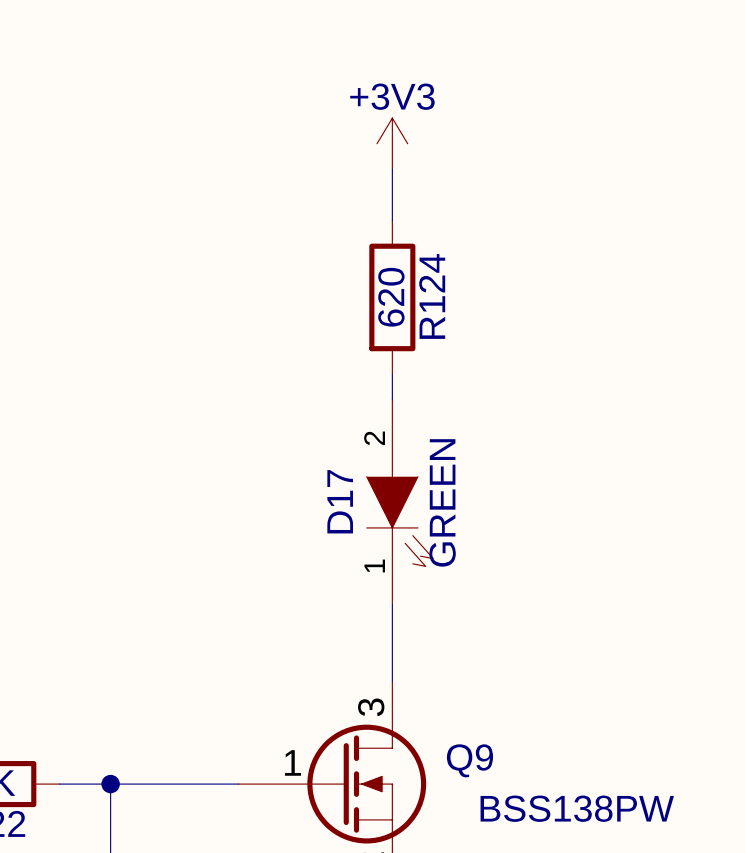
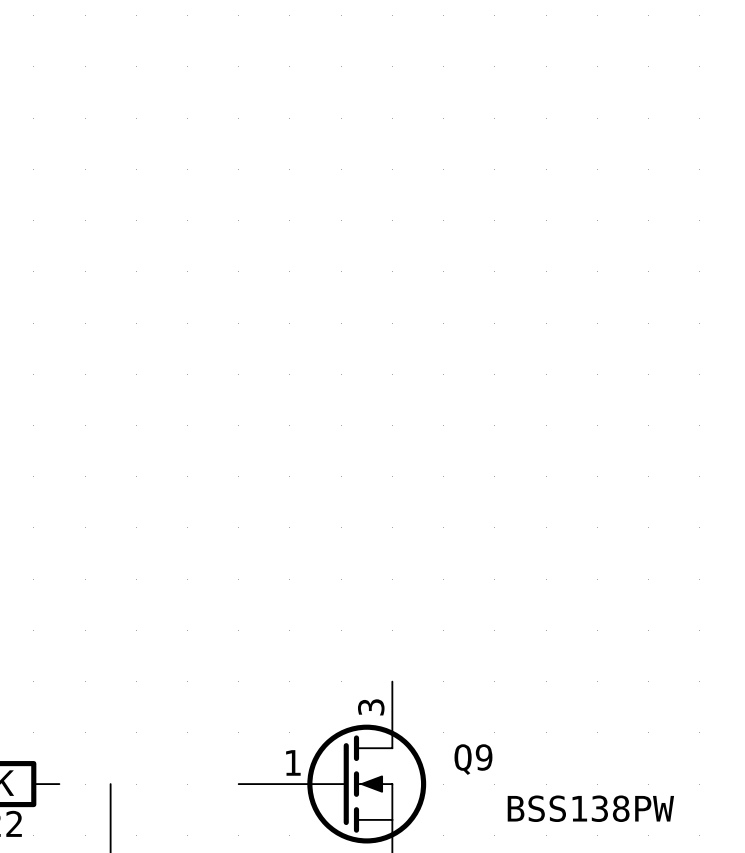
power symbol: +3V3 (392, 143) -> none
wire: (392, 169) (392, 220) -> none
R124: 620 (392, 297) -> none
wire: (392, 374) (392, 399) -> none
D17: GREEN (400, 502) -> none
wire: (392, 604) (392, 681) -> none
wire: (59, 784) (238, 784) -> none
junction: (110, 784) -> none

